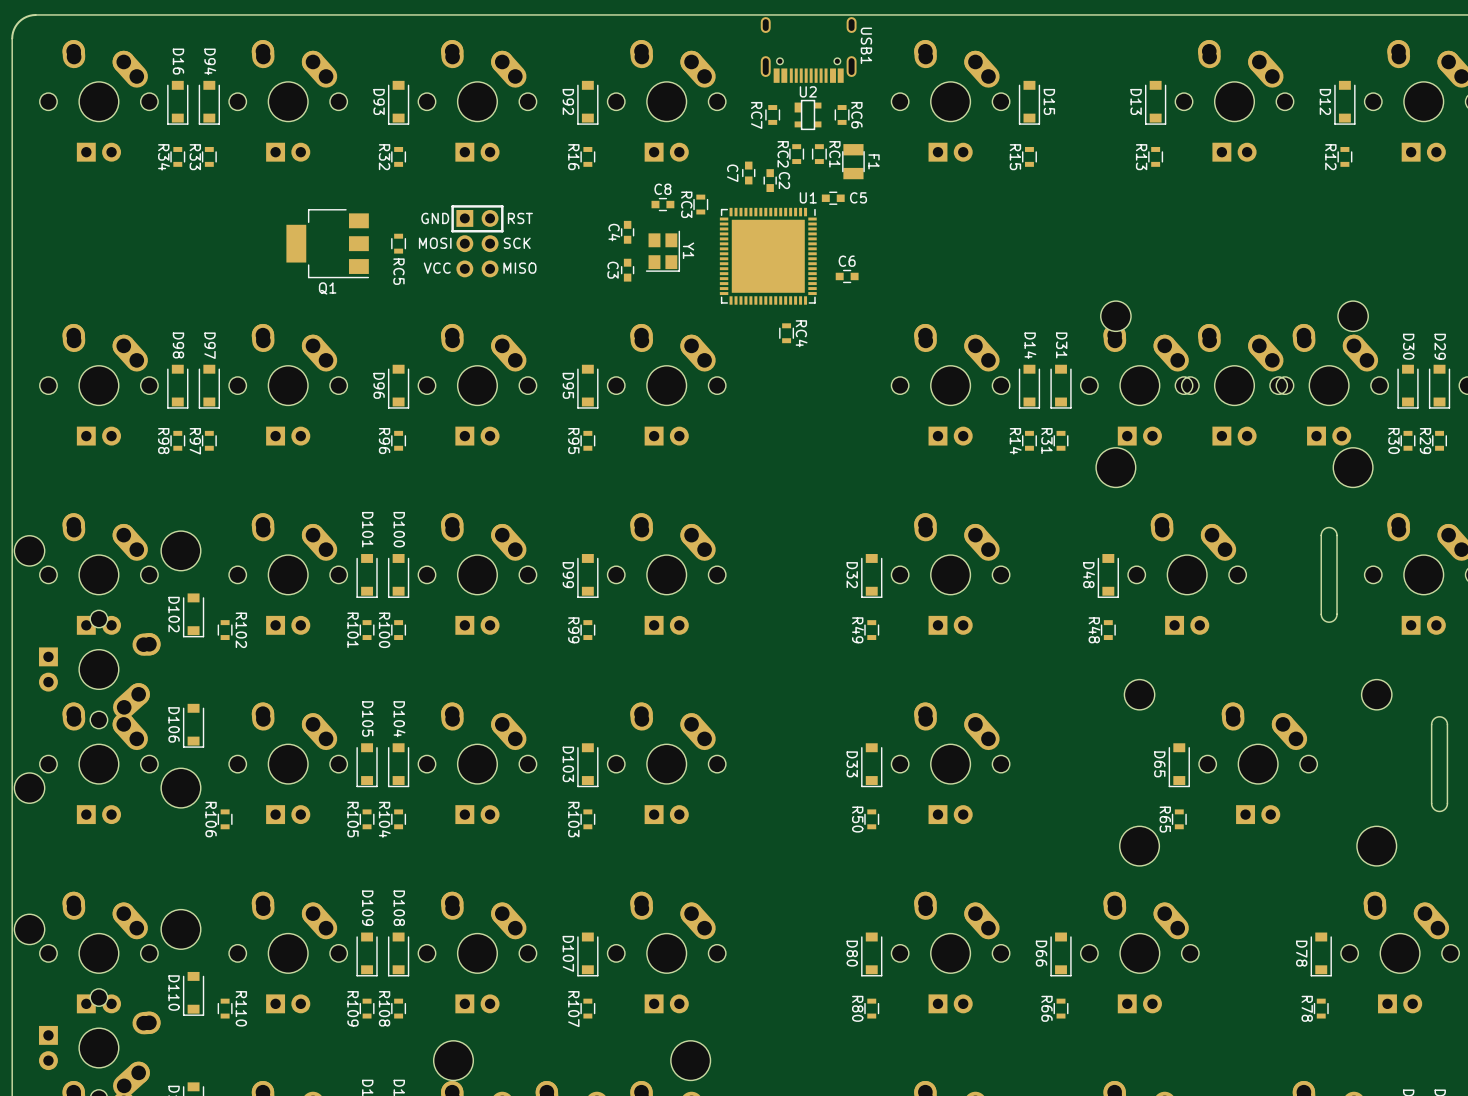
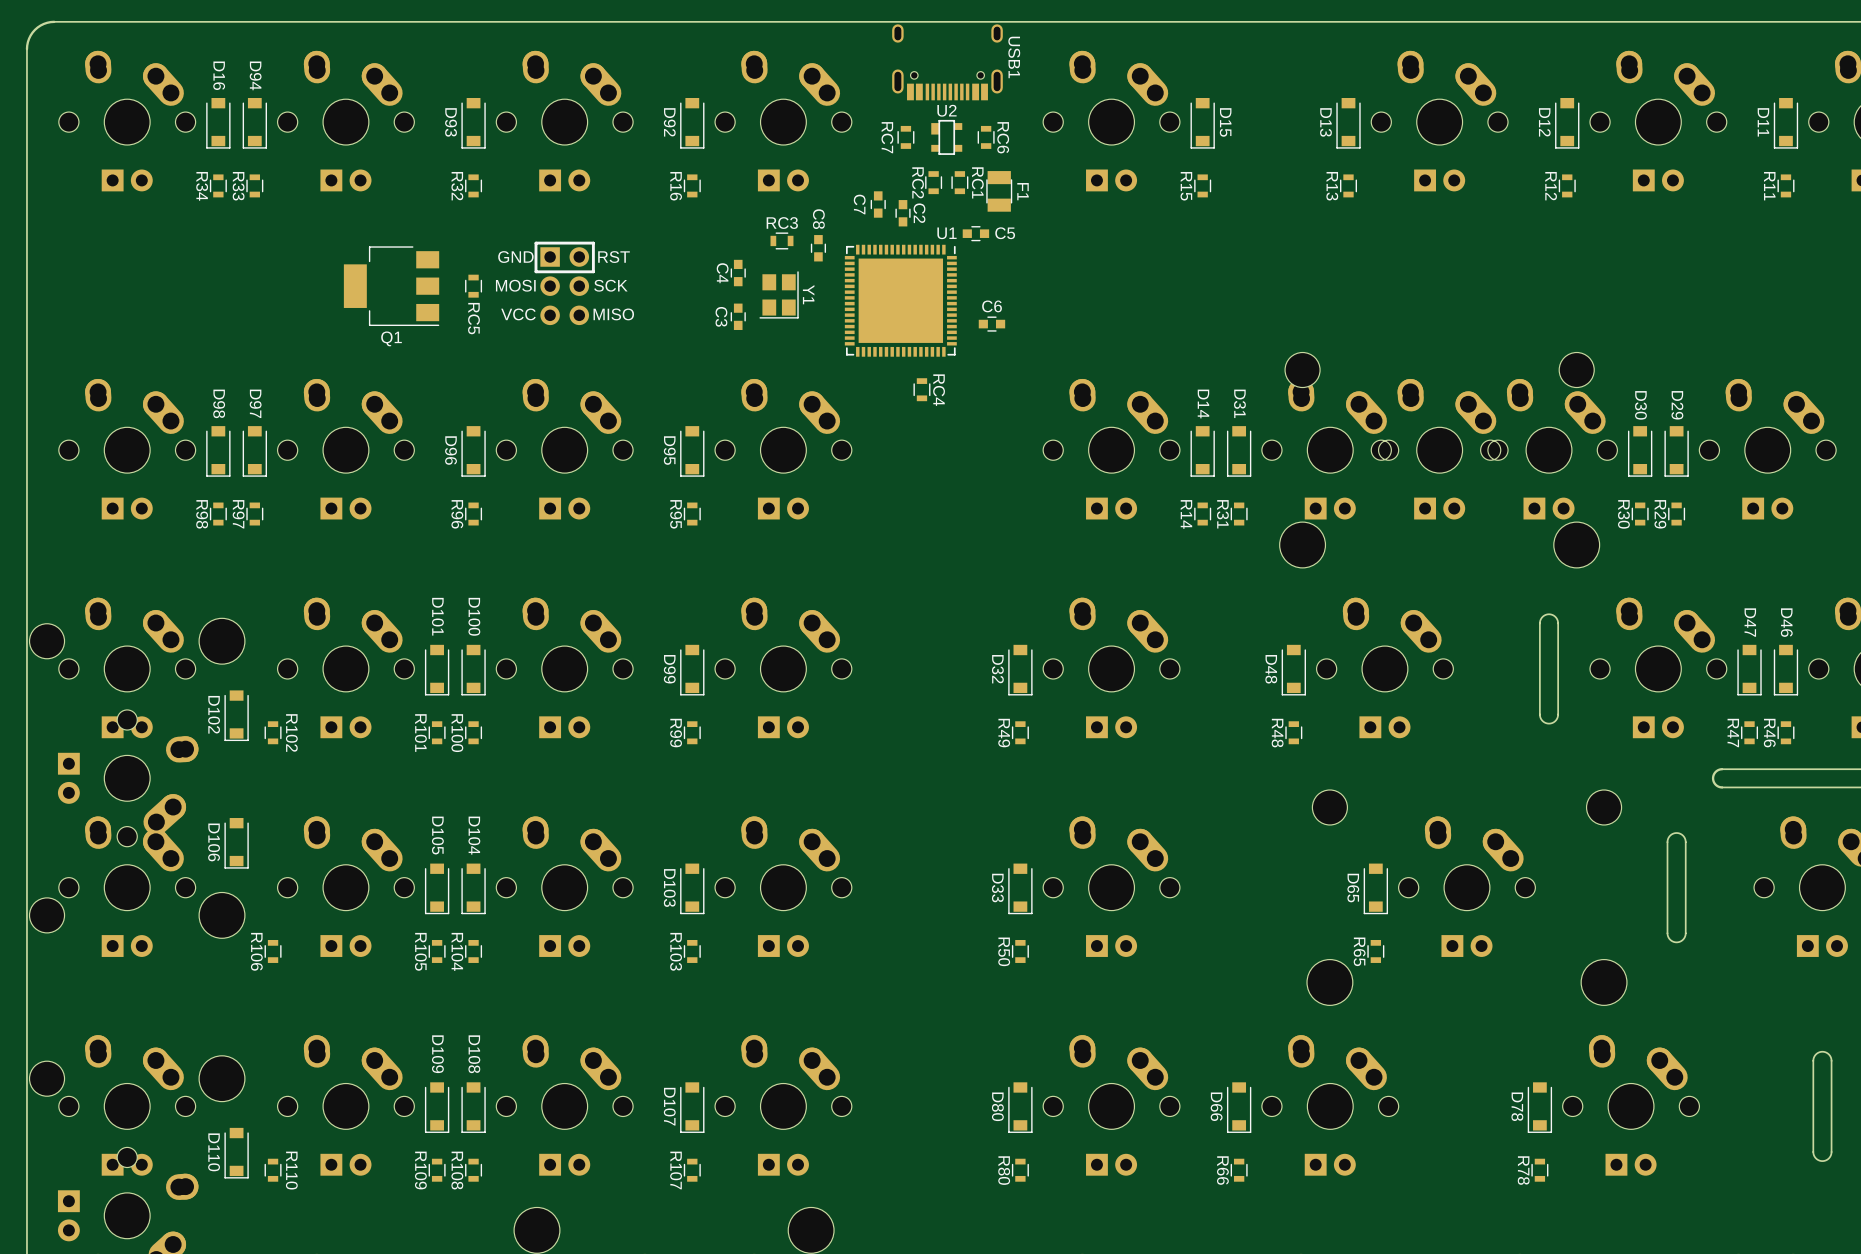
C8 rotation: 0° (662, 204) -> 90° clockwise (818, 248)
C8 position: (662, 204) -> (818, 248)
RC3 rotation: 0° (700, 204) -> 90° clockwise (781, 240)
RC3 position: (700, 204) -> (781, 240)

